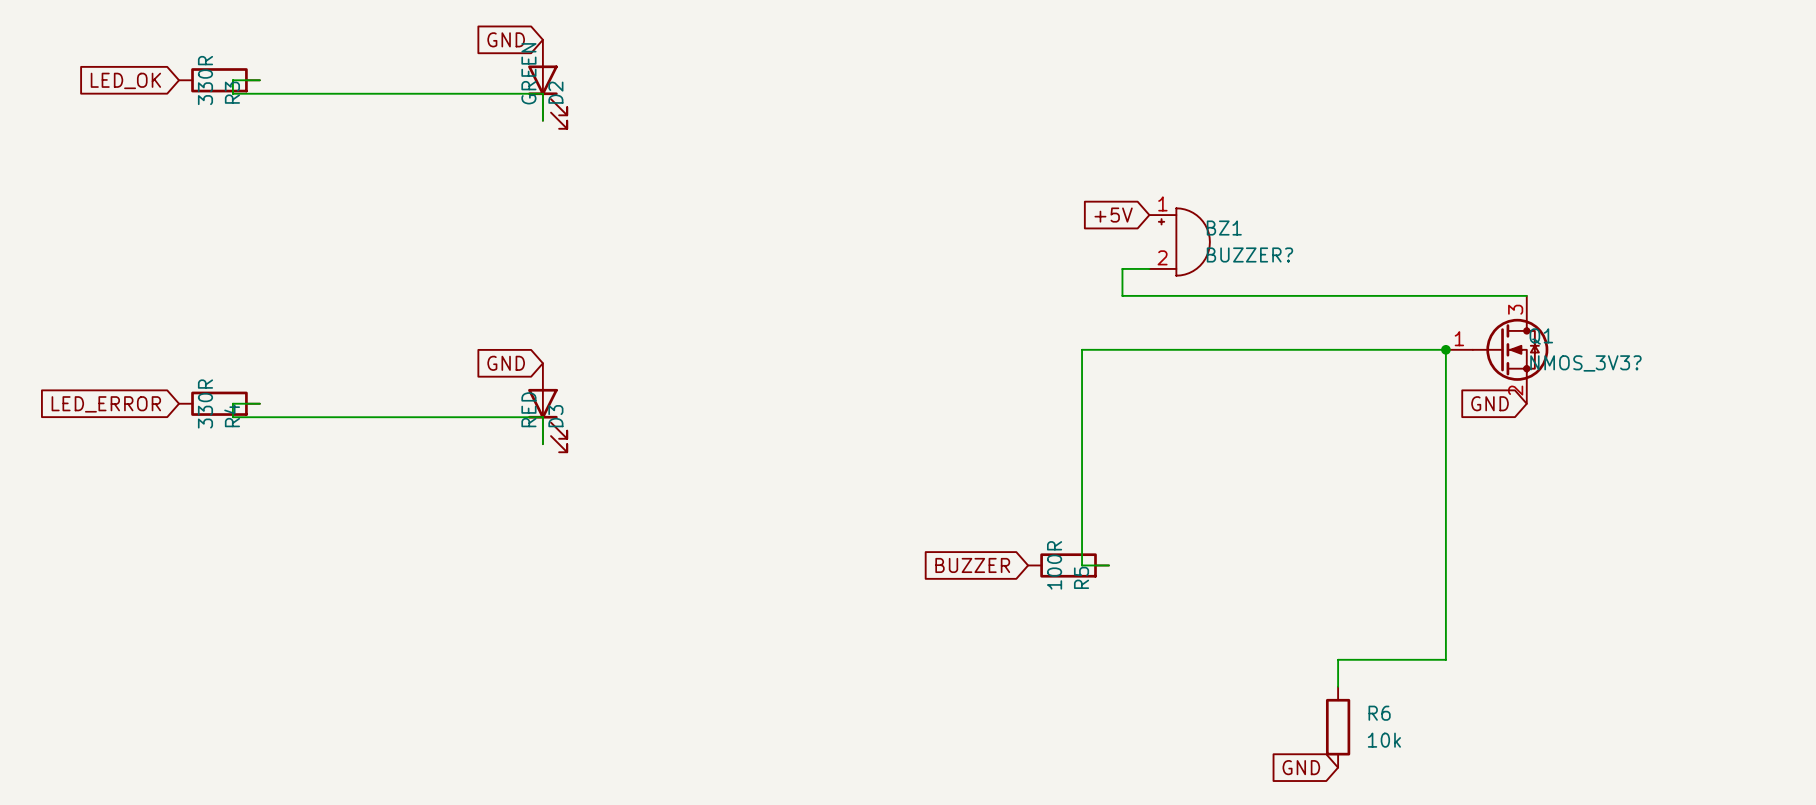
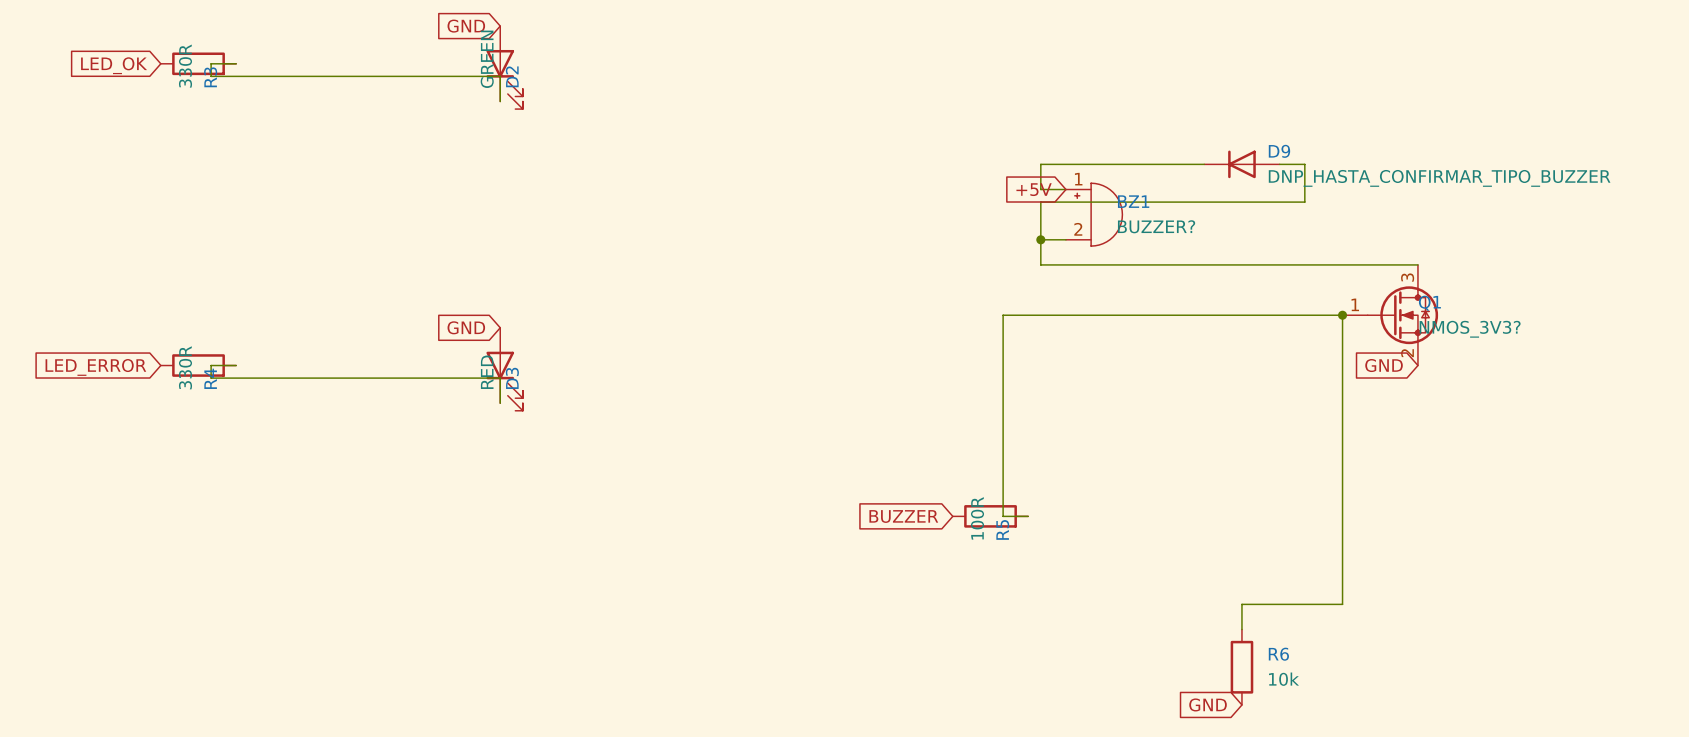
wire: none -> (1204, 164) (1040, 164) (1040, 189) (1065, 189)
D9: none -> DNP_HASTA_CONFIRMAR_TIPO_BUZZER (1241, 164)
wire: none -> (1279, 164) (1304, 164) (1304, 202) (1040, 202) (1040, 239)
junction: none -> (1040, 239)

